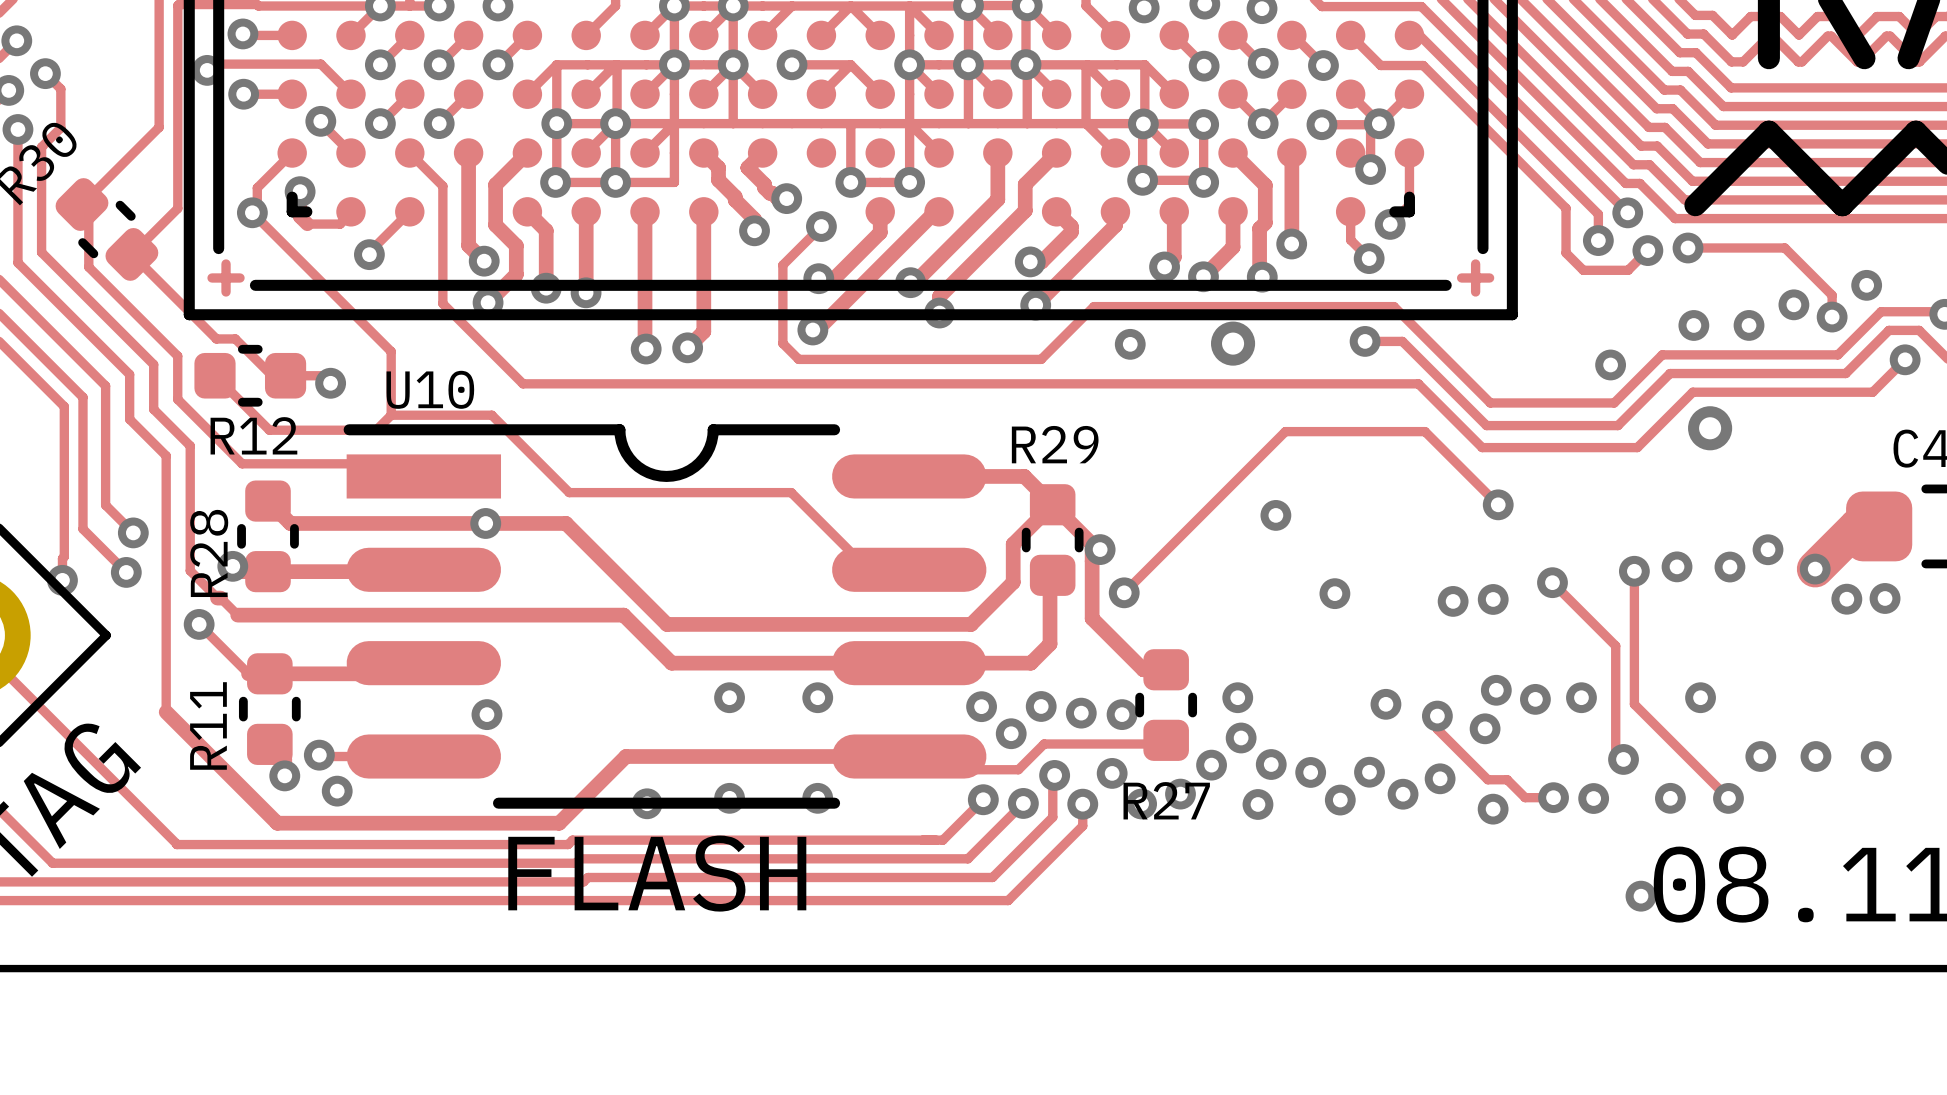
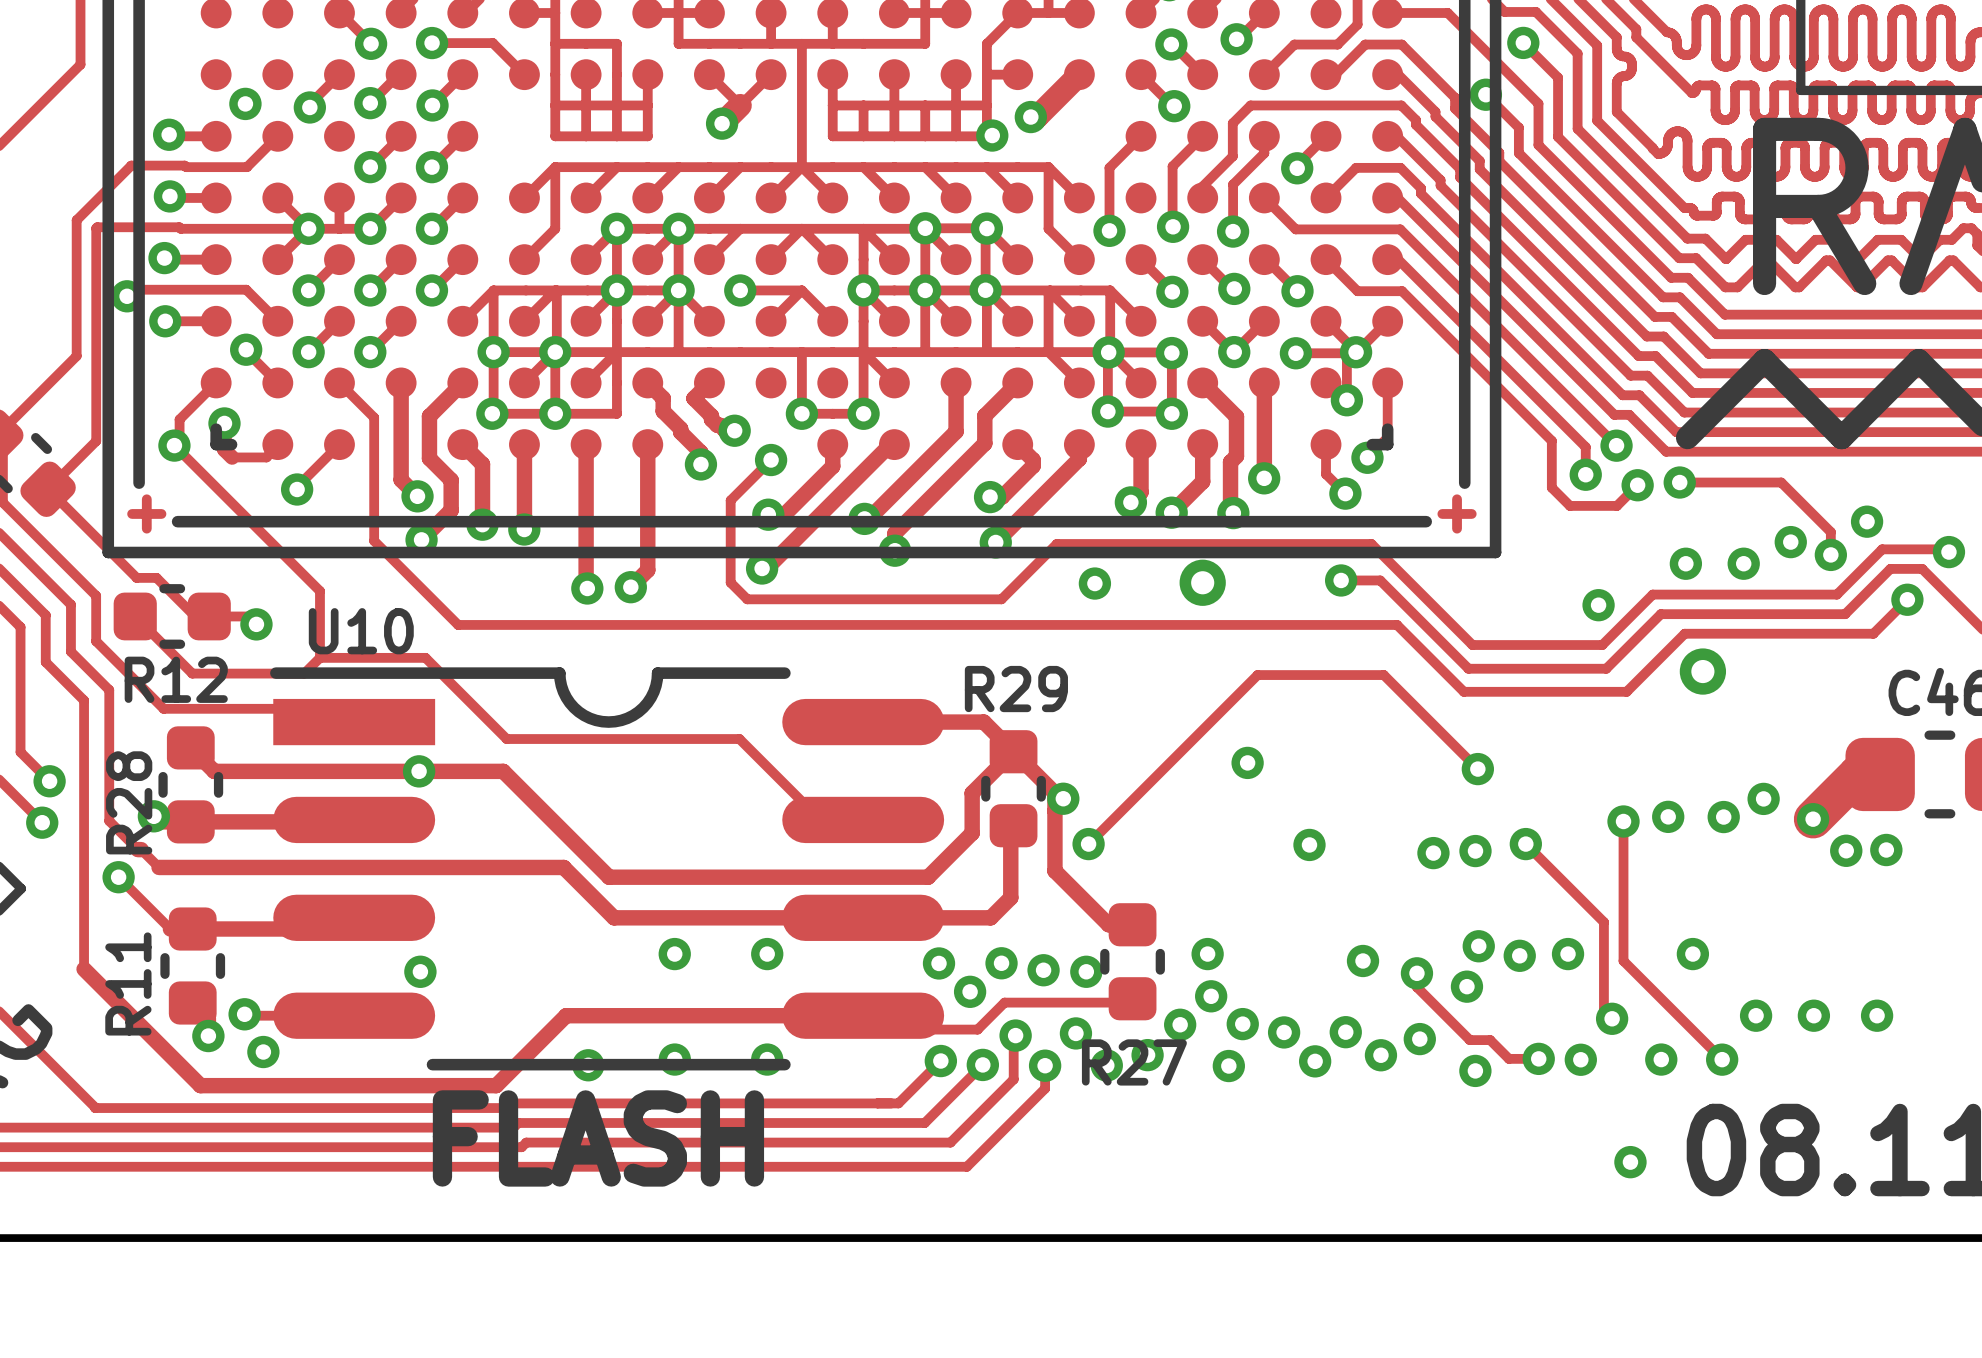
track: (1405, 431) (1425, 431) (1498, 504) -> (1383, 675) (1477, 769)
via position: (1498, 504) -> (1477, 769)
track: (1552, 582) (1615, 645) (1615, 667) -> (1525, 844) (1603, 922)
via position: (1552, 582) -> (1525, 844)

